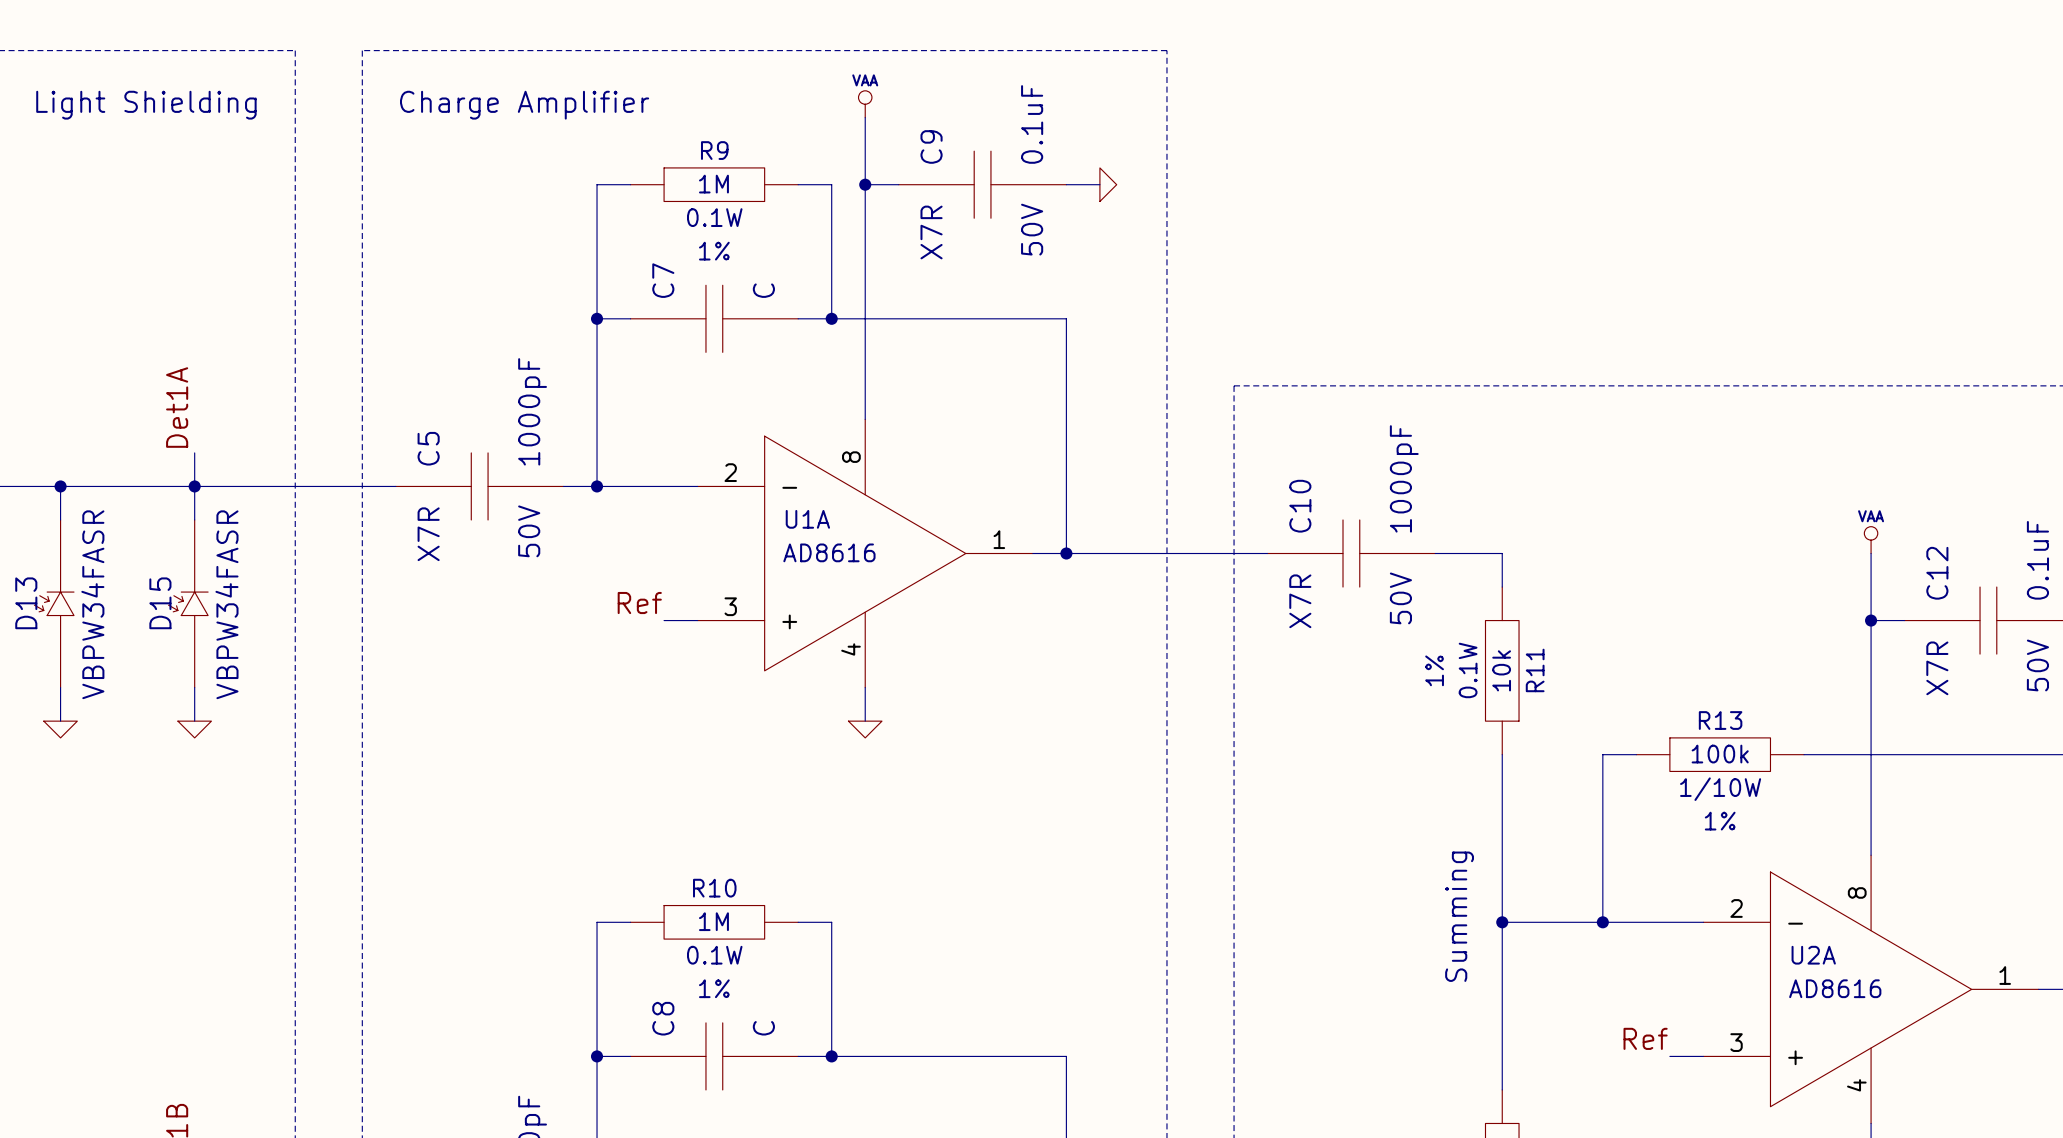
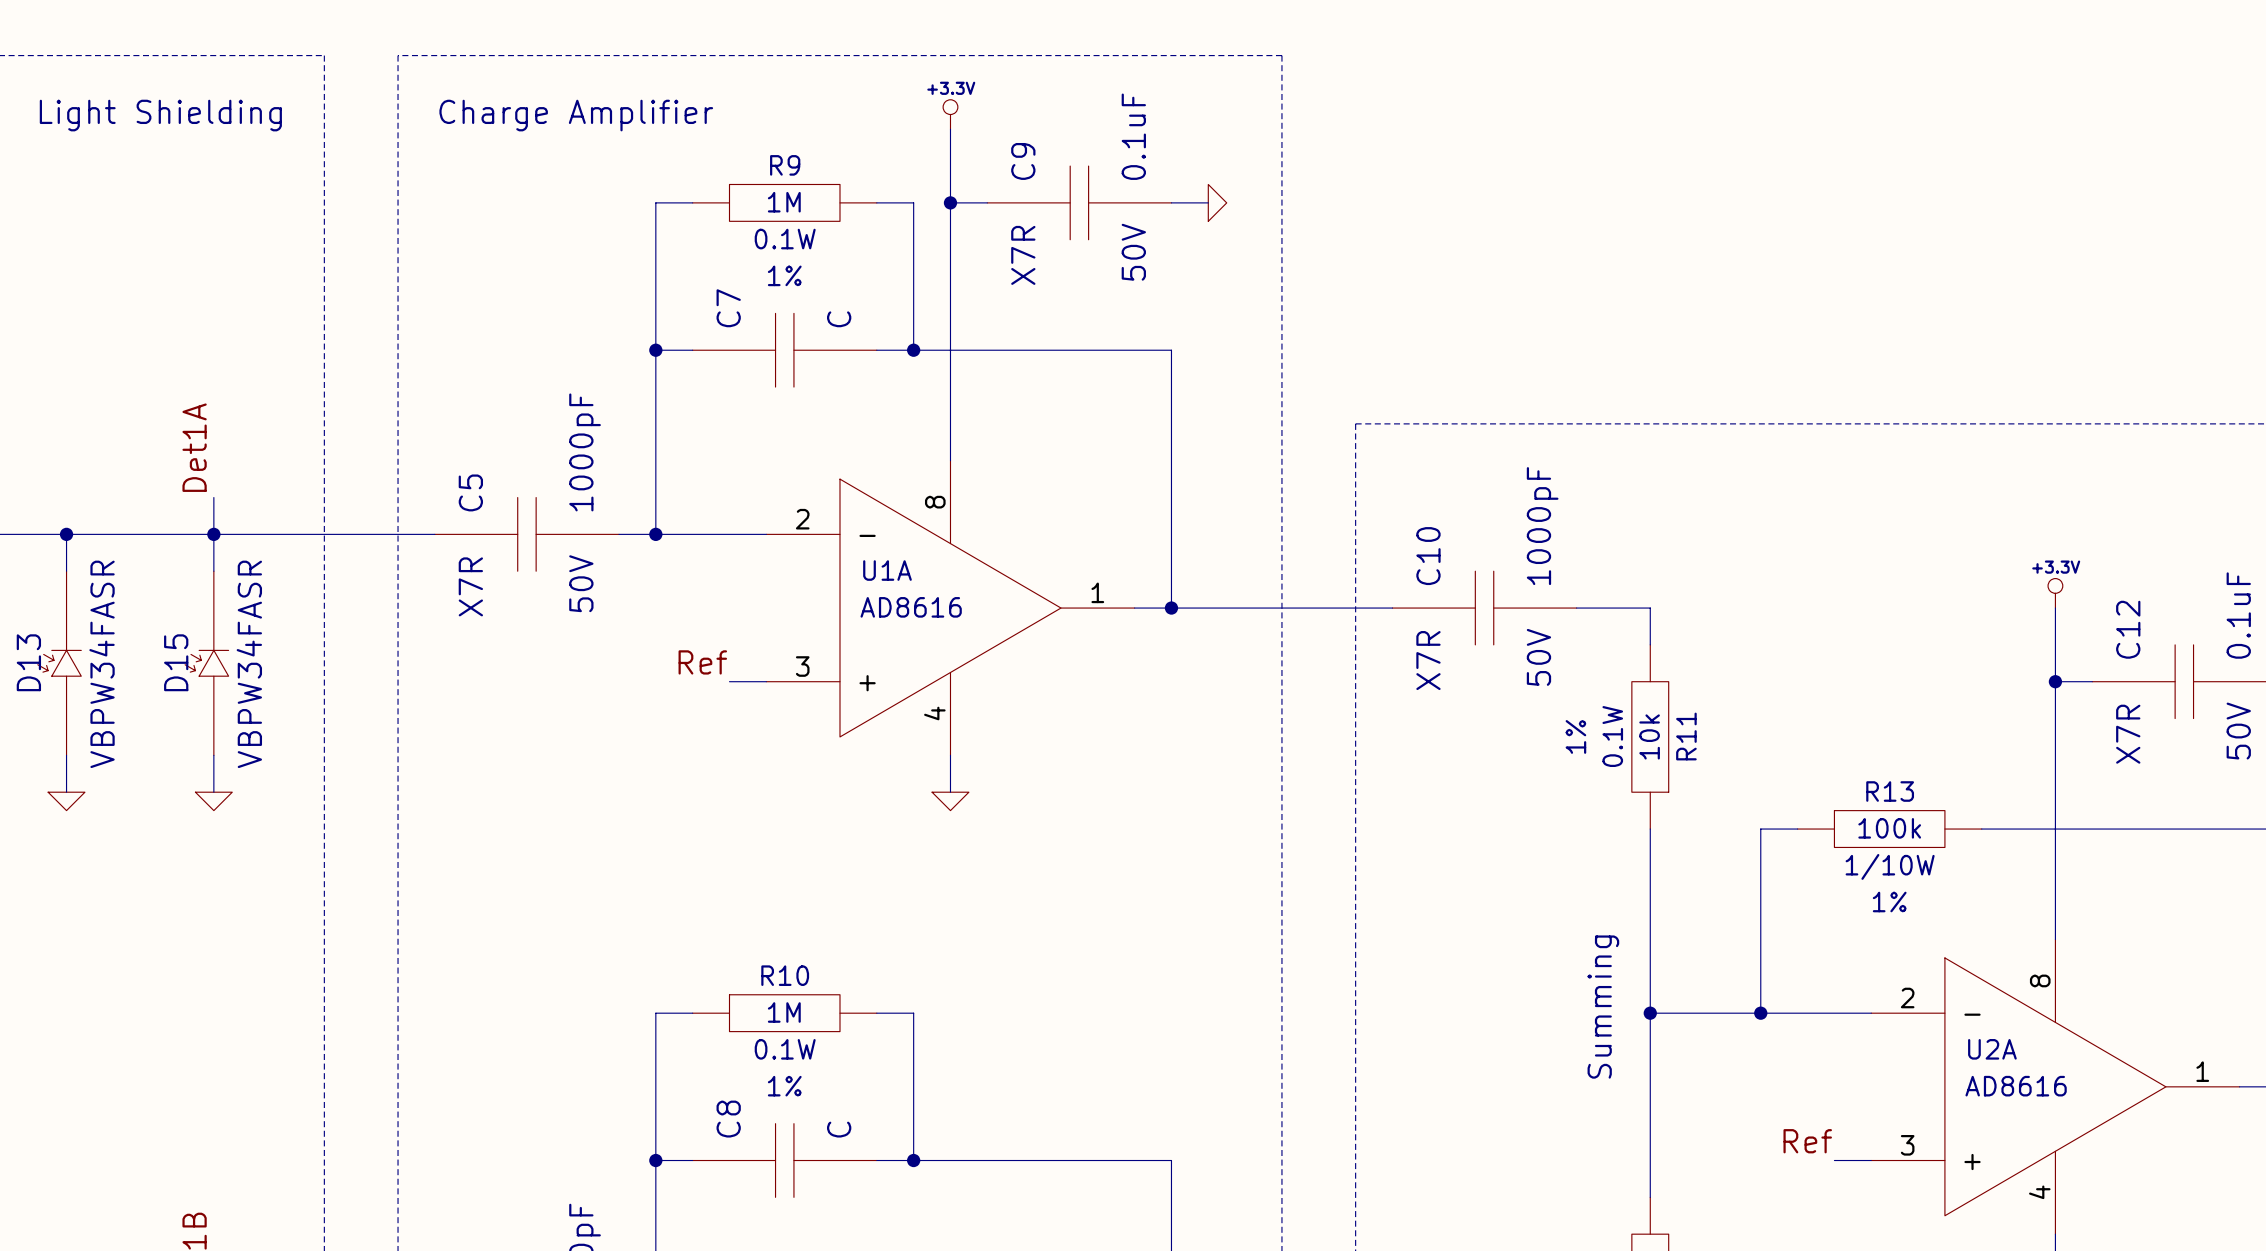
power symbol: VAA (865, 104) -> +3.3V (950, 114)
power symbol: VAA (1871, 540) -> +3.3V (2055, 593)

